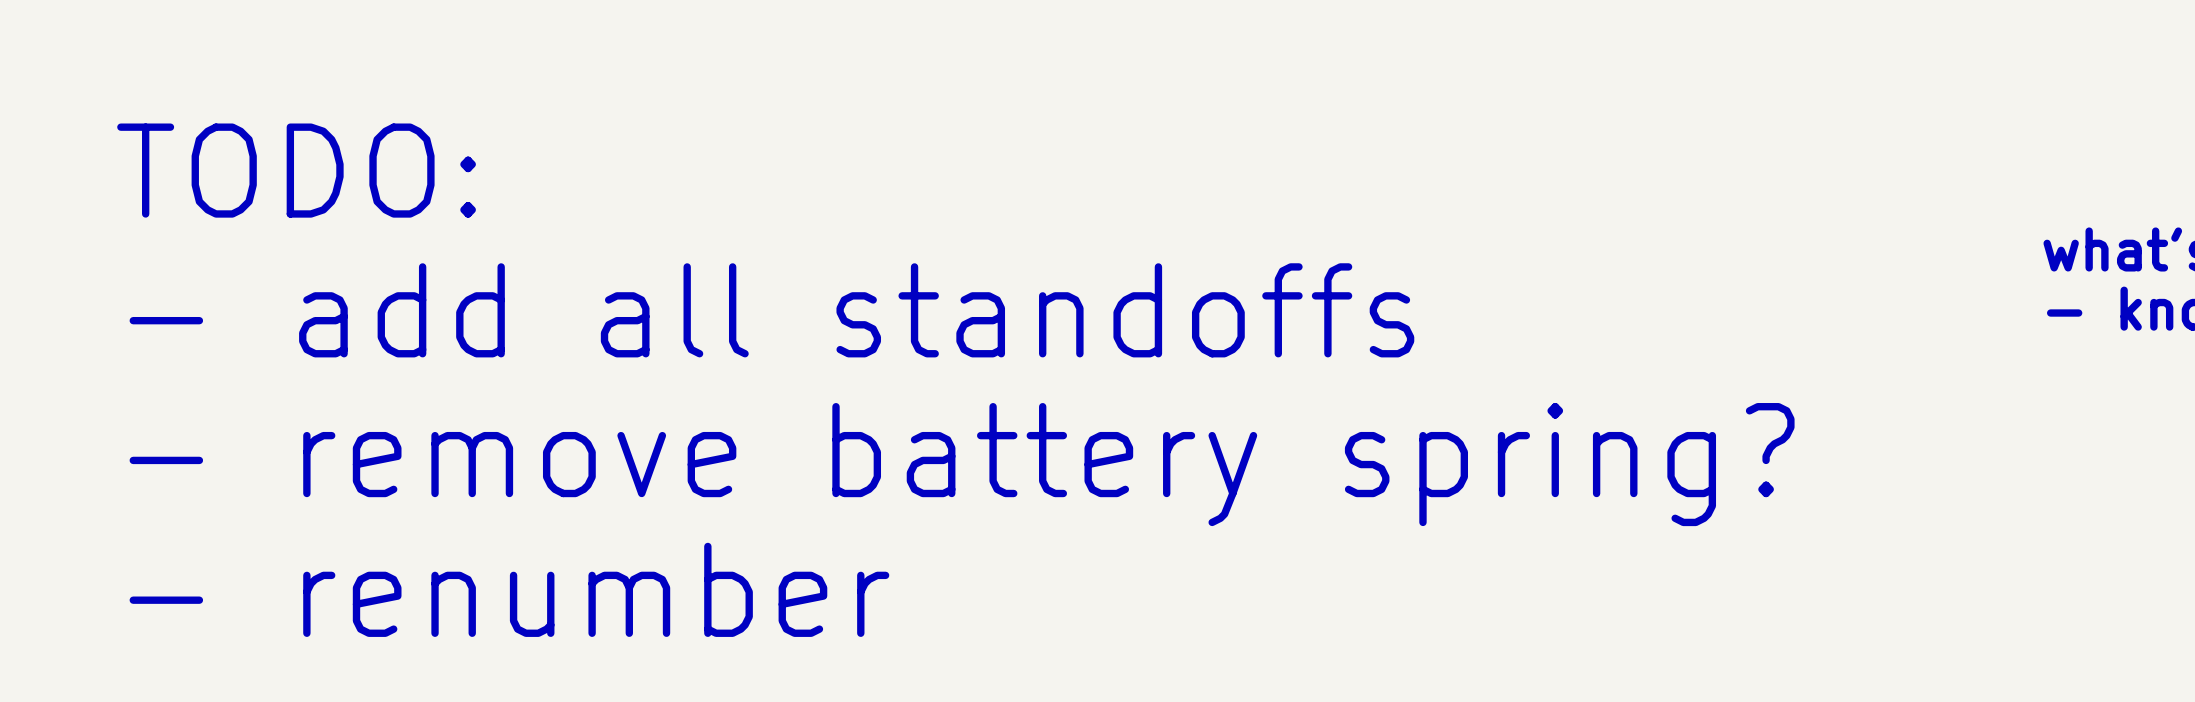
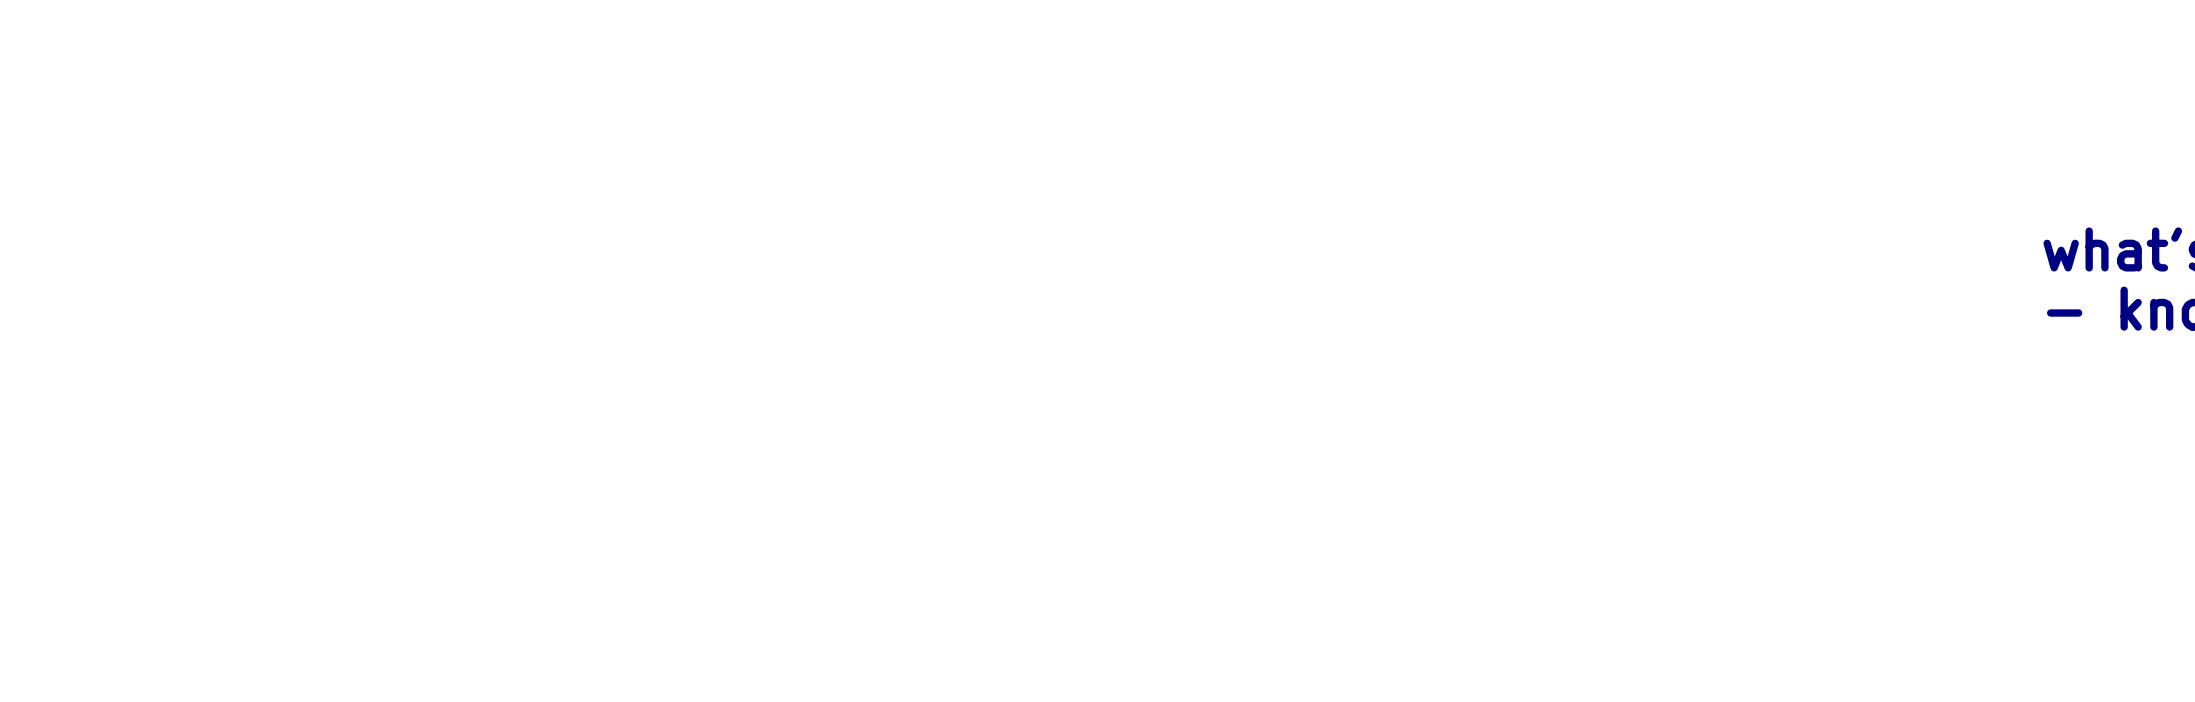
text: TODO: (296, 170) -> none
text: - add all standoffs (771, 310) -> none
text: - remove battery spring? (962, 464) -> none
text: - renumber (509, 589) -> none

